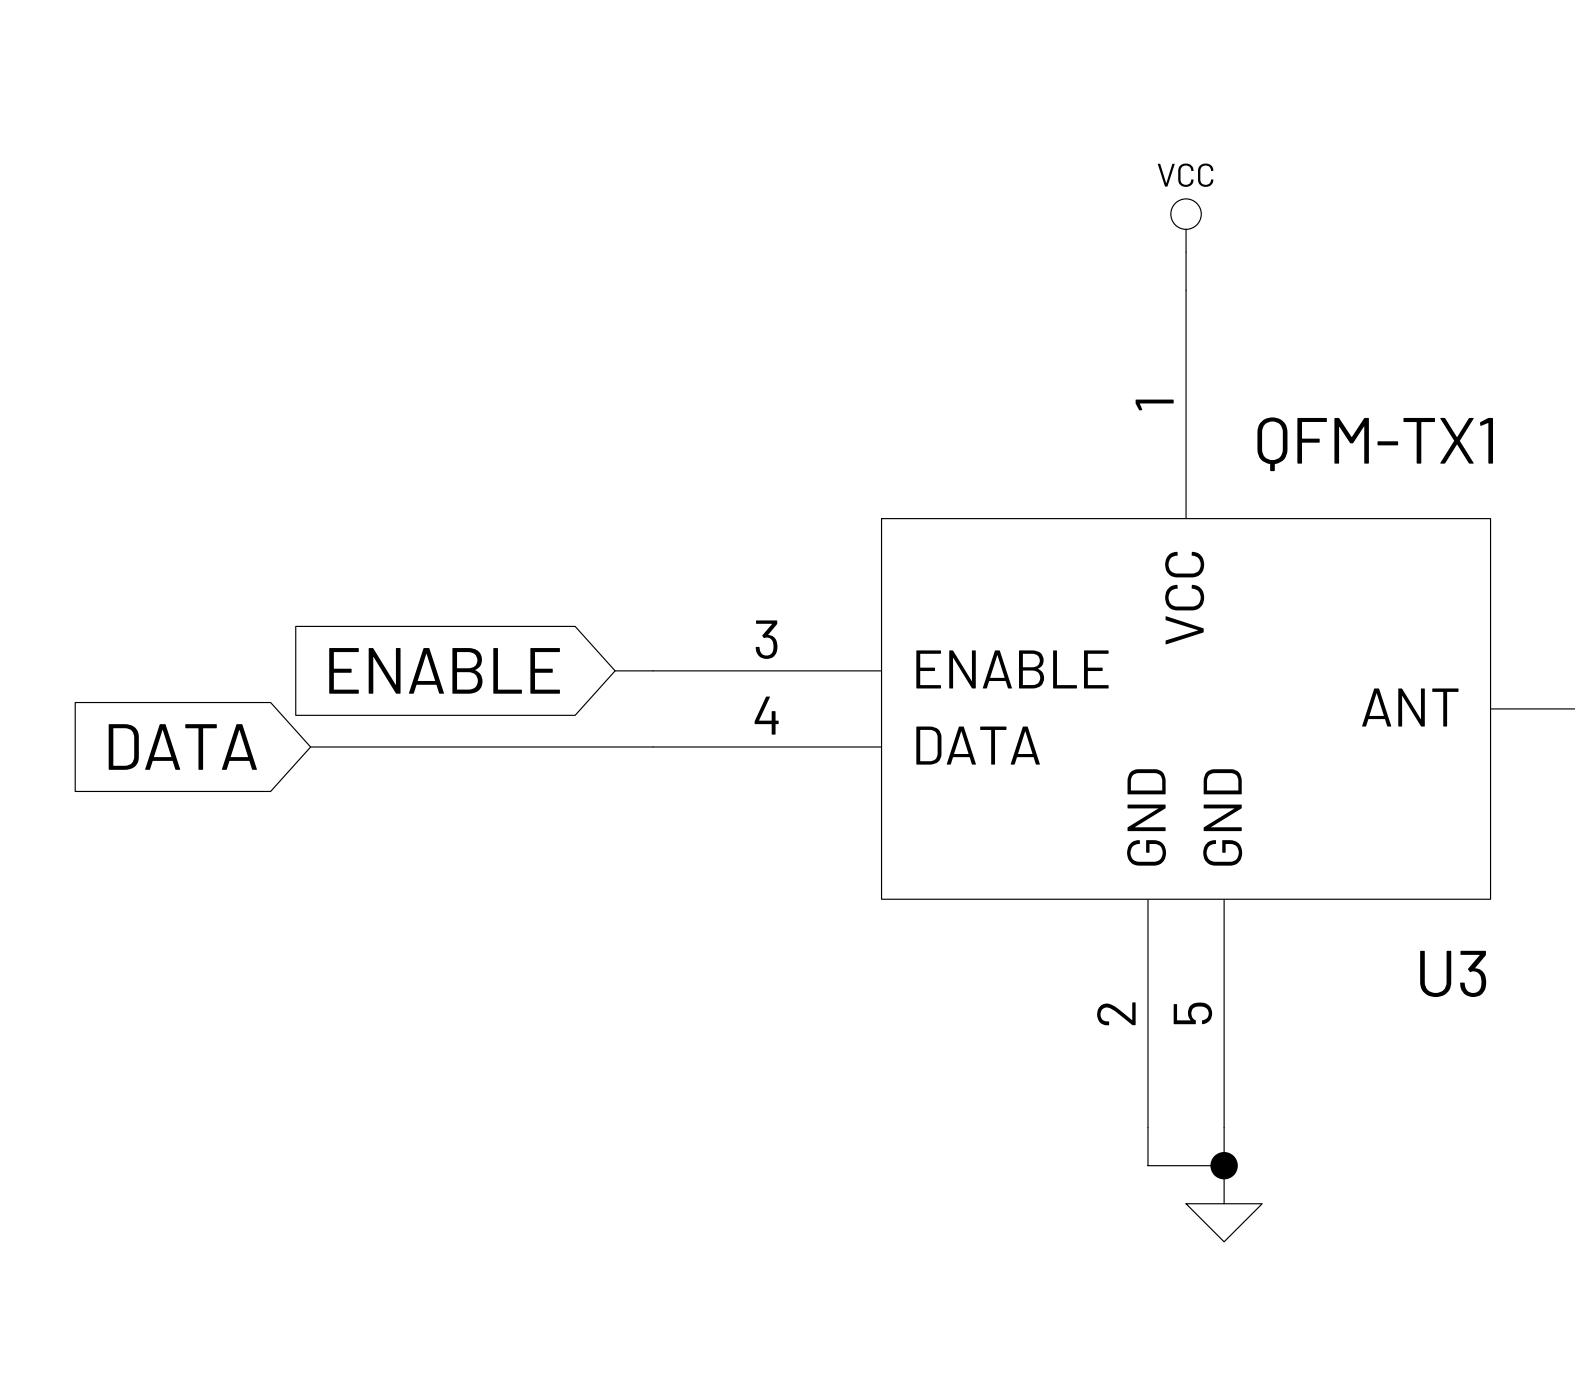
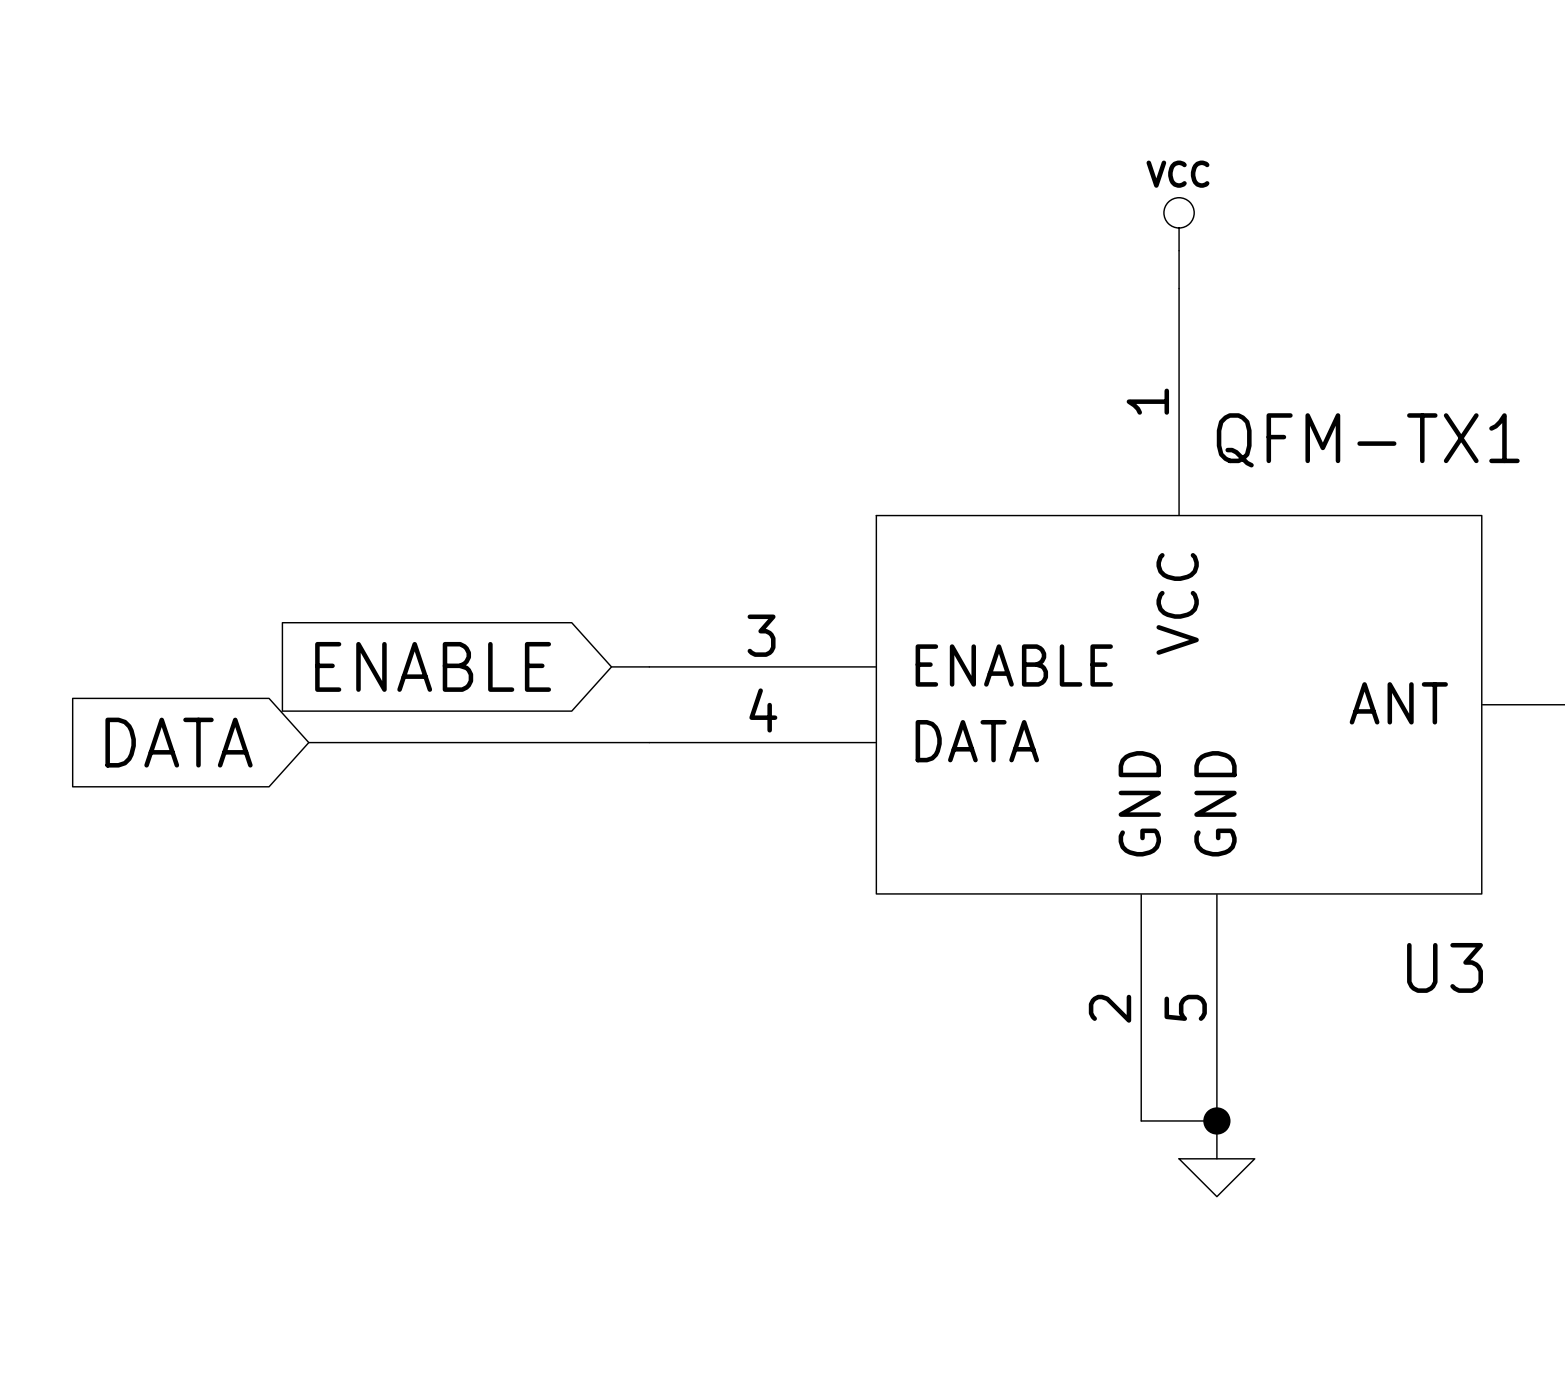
wire: (1147, 1127) (1147, 1165) (1224, 1165) (1224, 1203) -> (1141, 1120) (1216, 1120)
junction position: (1224, 1165) -> (1216, 1120)
power symbol position: (1224, 1222) -> (1216, 1177)

